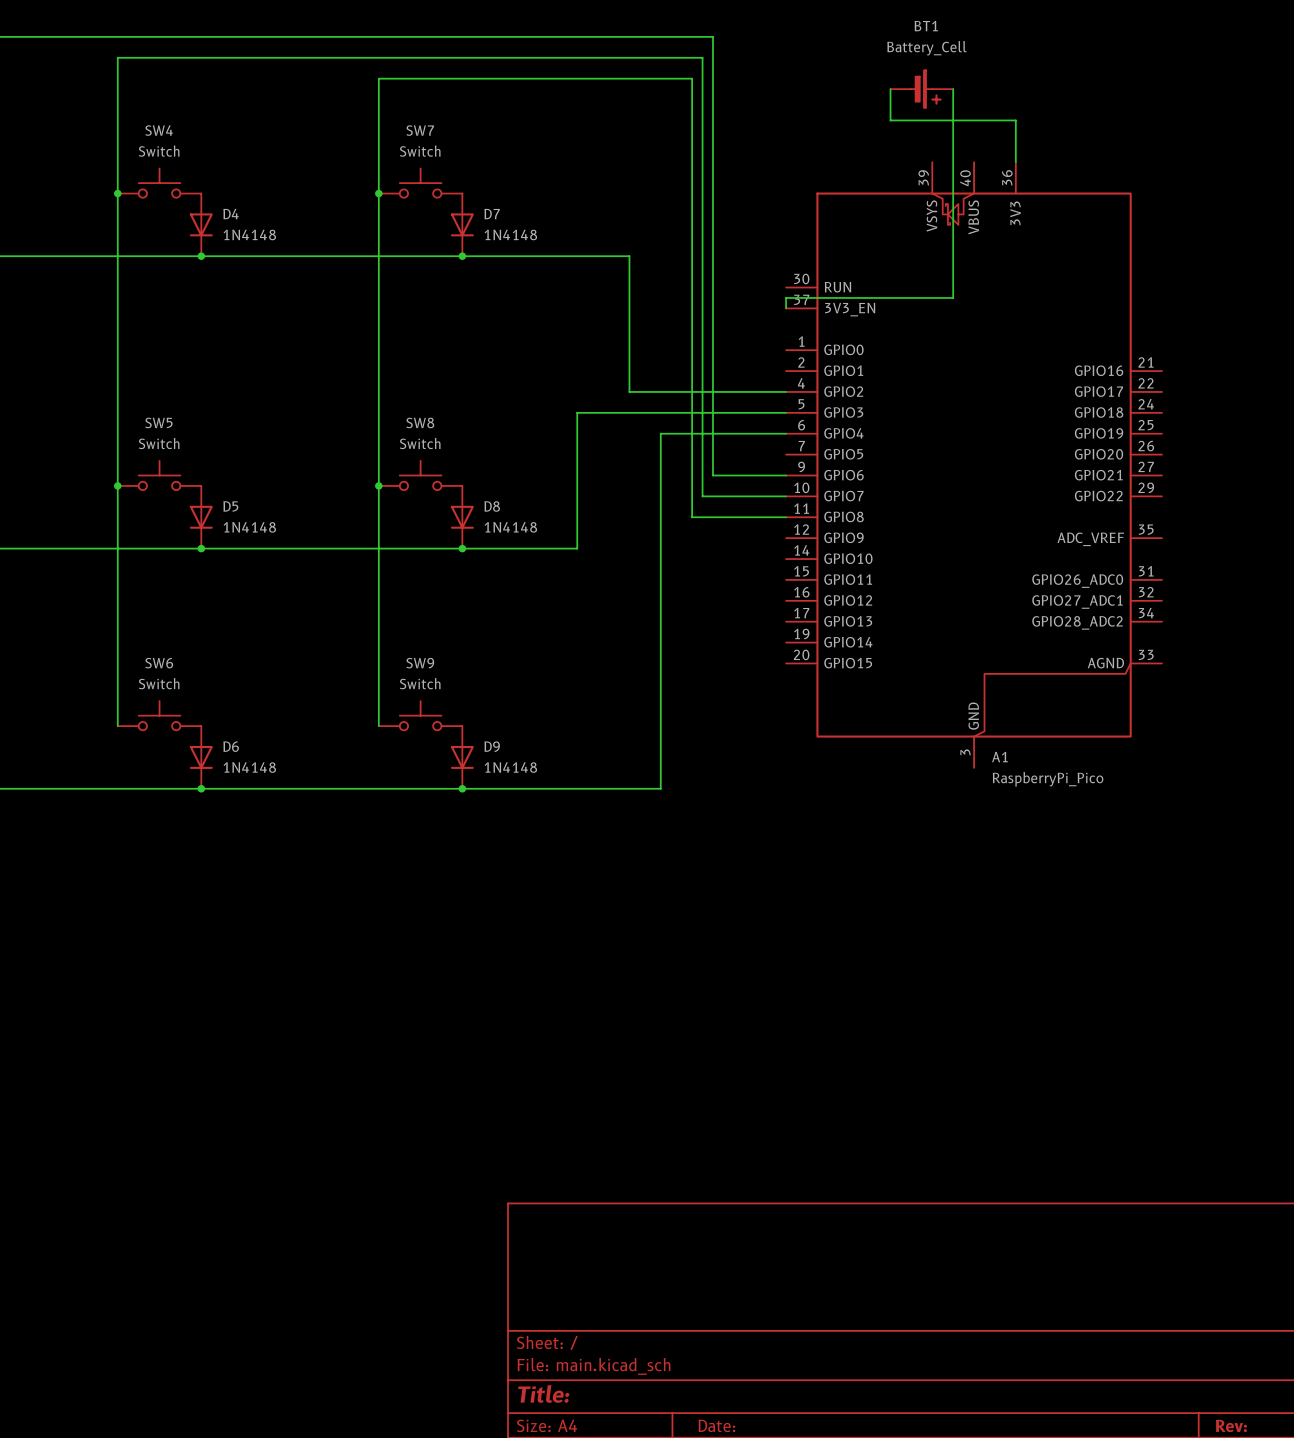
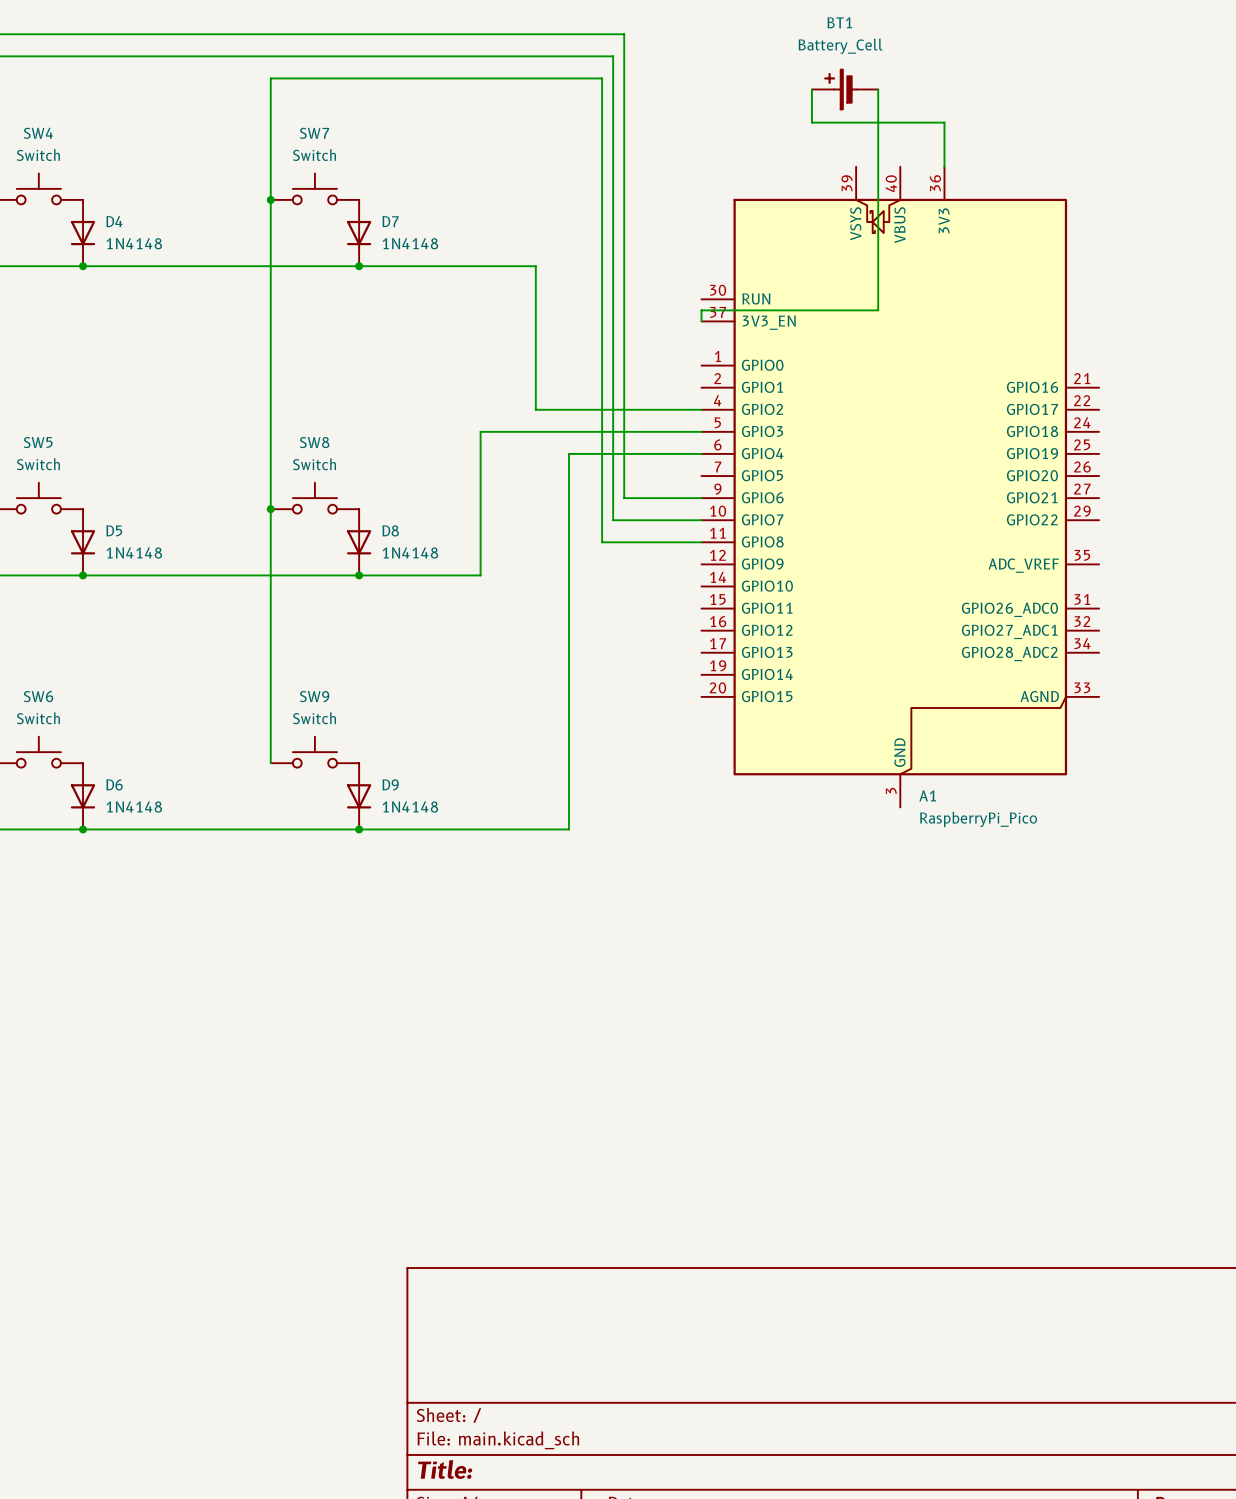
BT1 rotation: 0° (926, 89) -> 180° (840, 89)

